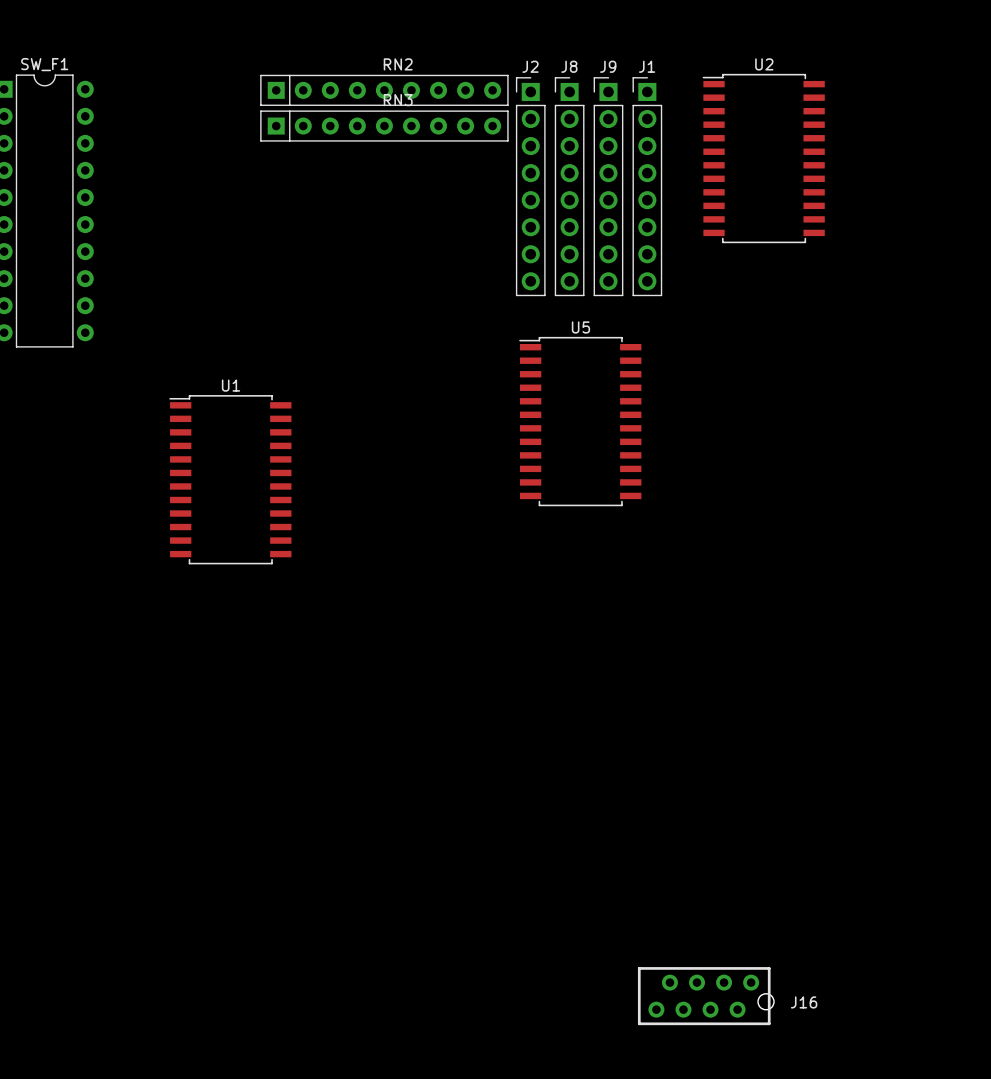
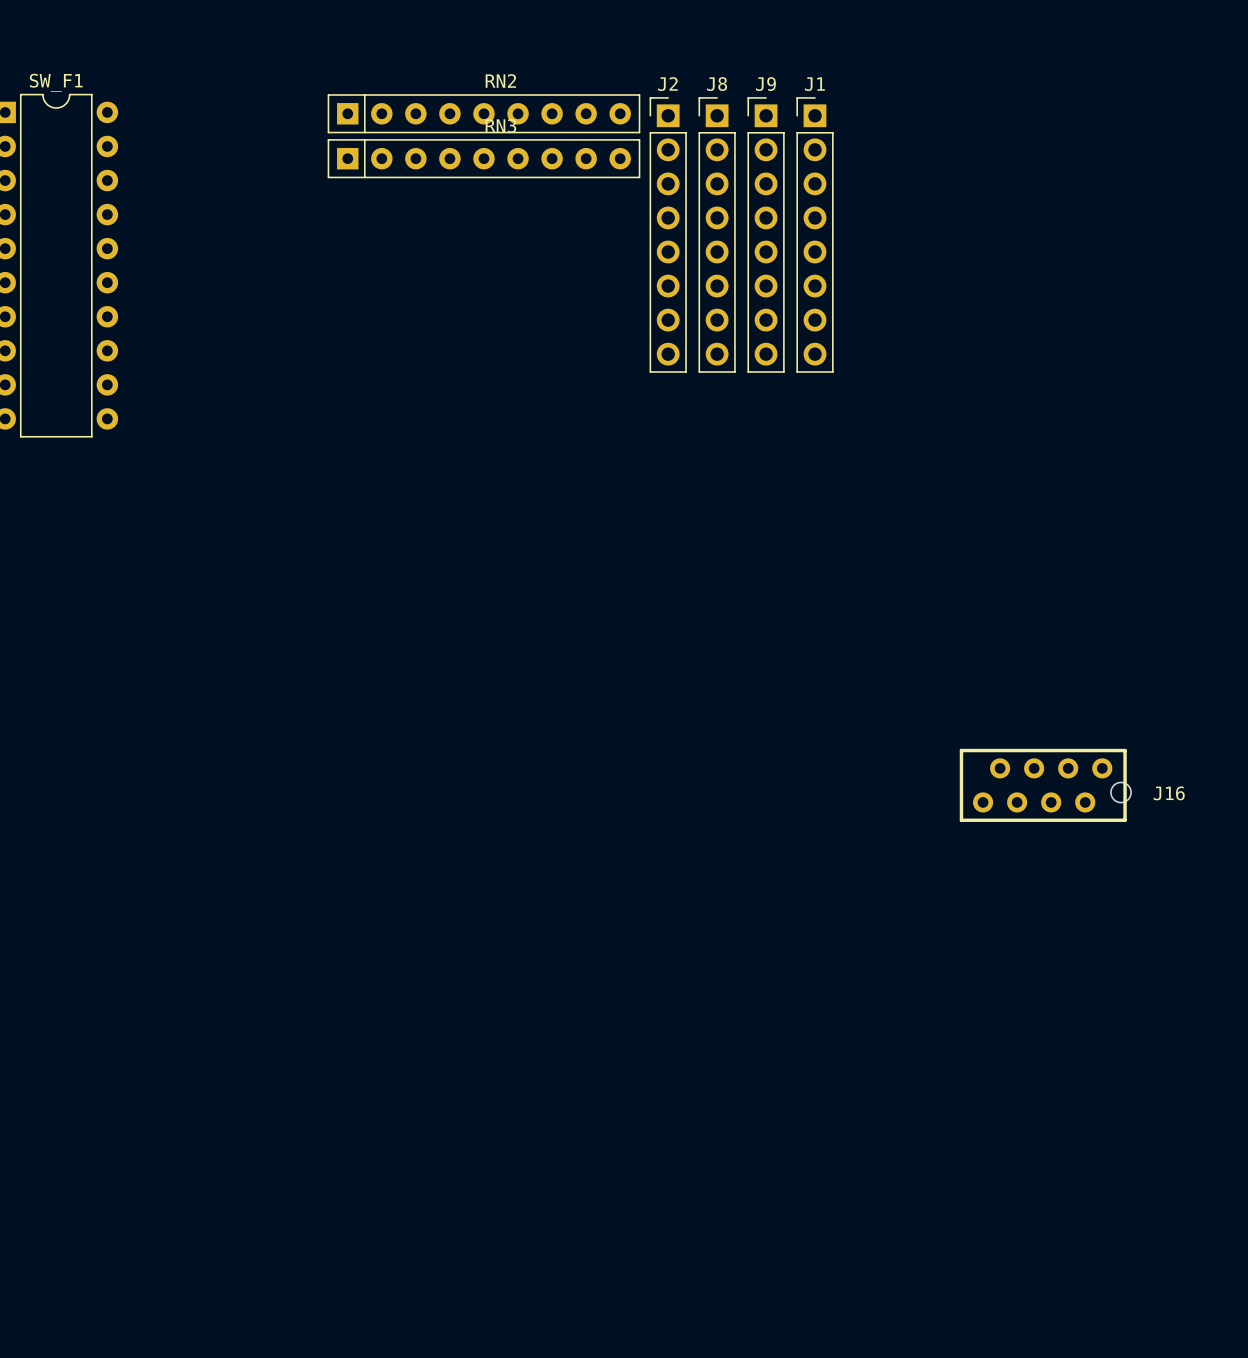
U2: (763, 158) -> none
U5: (580, 421) -> none
U1: (230, 479) -> none
J16 position: (705, 996) -> (1045, 785)

